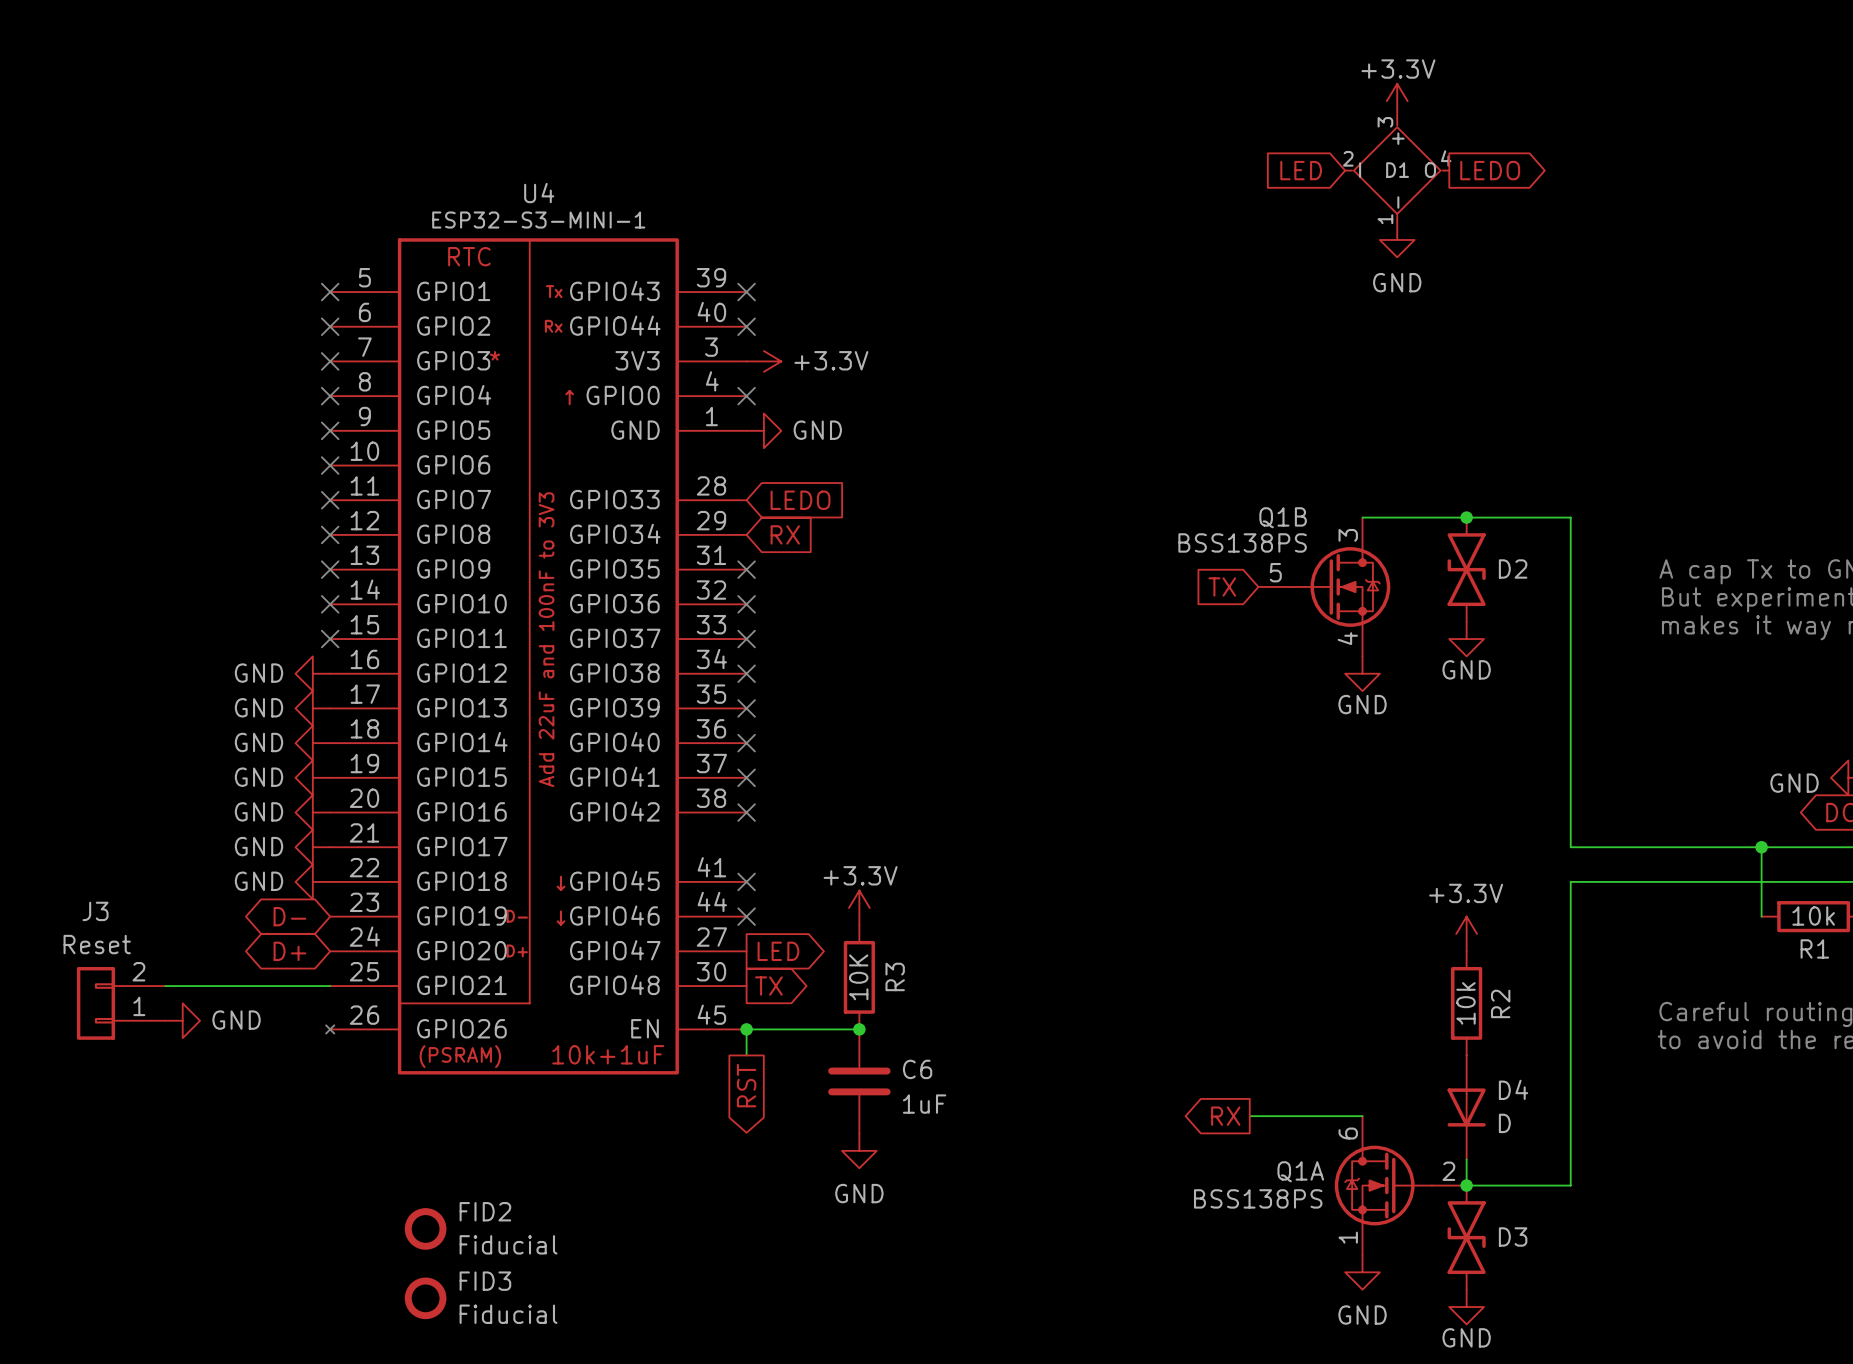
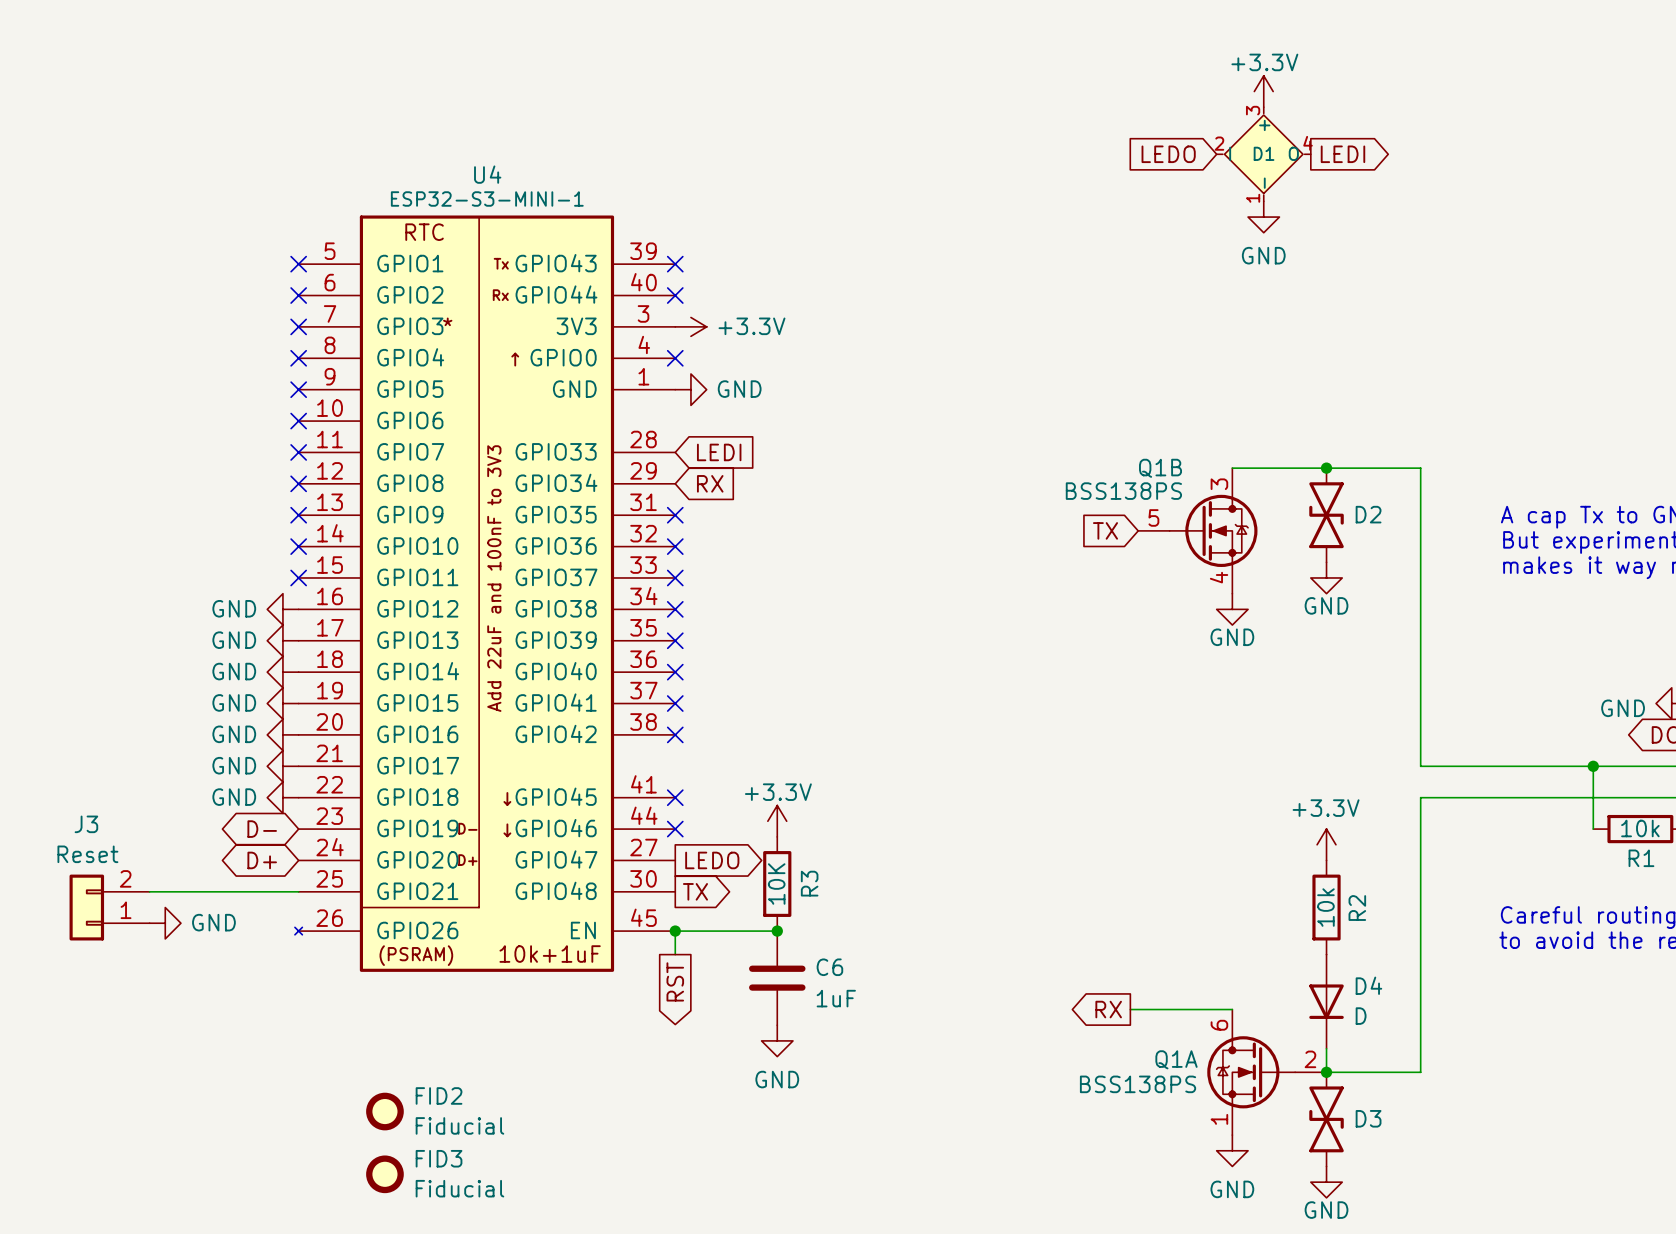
global label: LED (1301, 170) -> LEDO (1168, 154)
global label: LEDO (1490, 170) -> LEDI (1342, 154)
global label: LEDO (800, 500) -> LEDI (719, 452)
global label: LED (778, 951) -> LEDO (712, 860)

